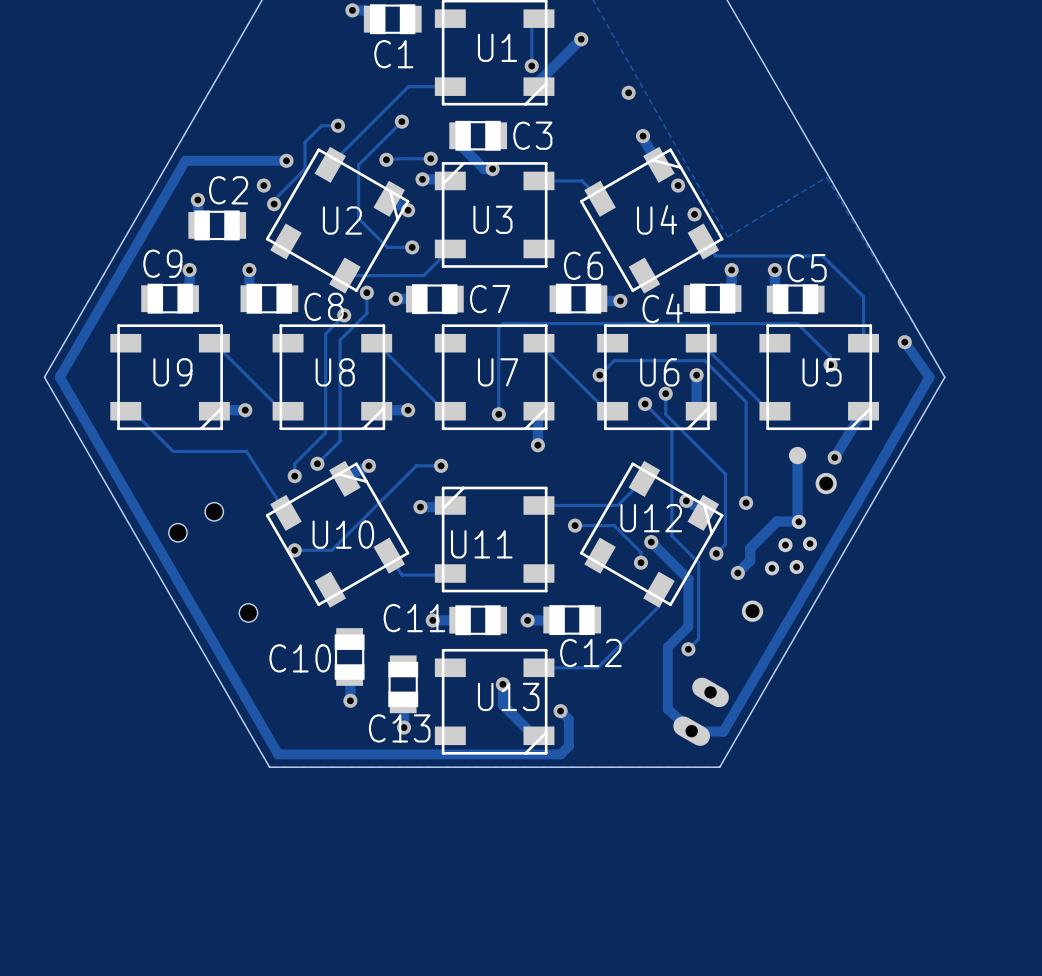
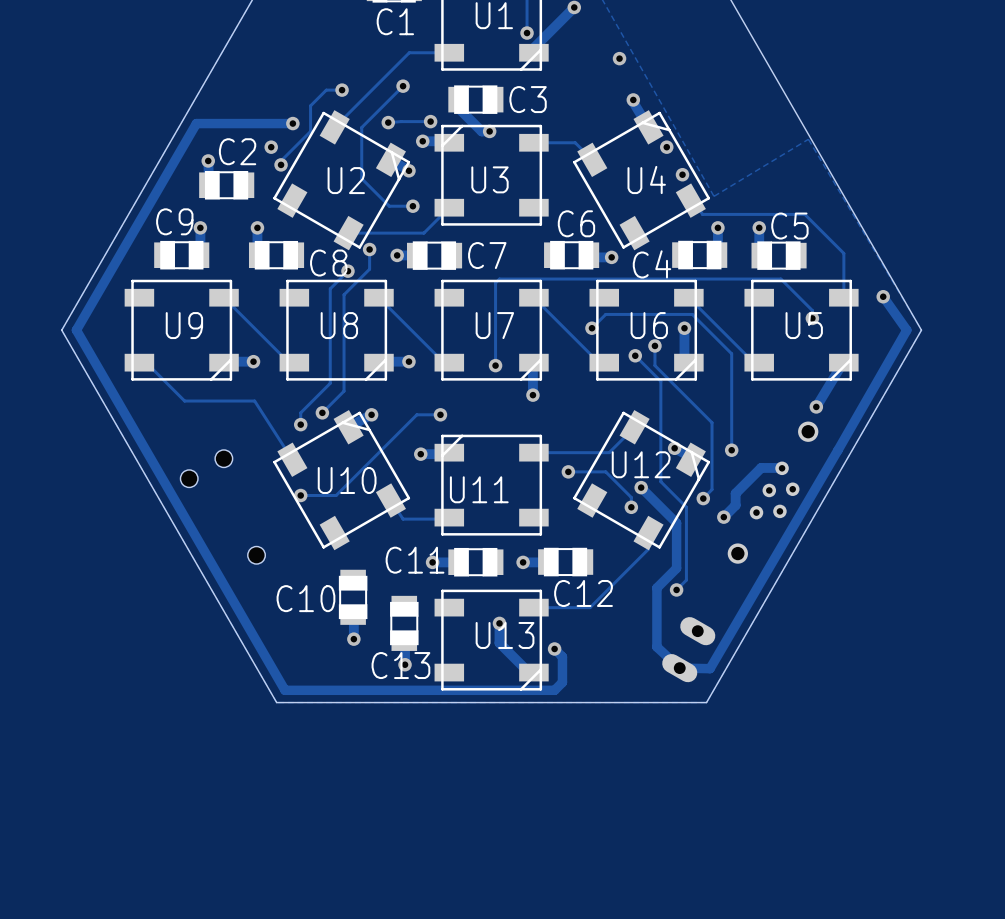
track: (797, 455) (797, 521) -> none
part: (797, 455) -> none

